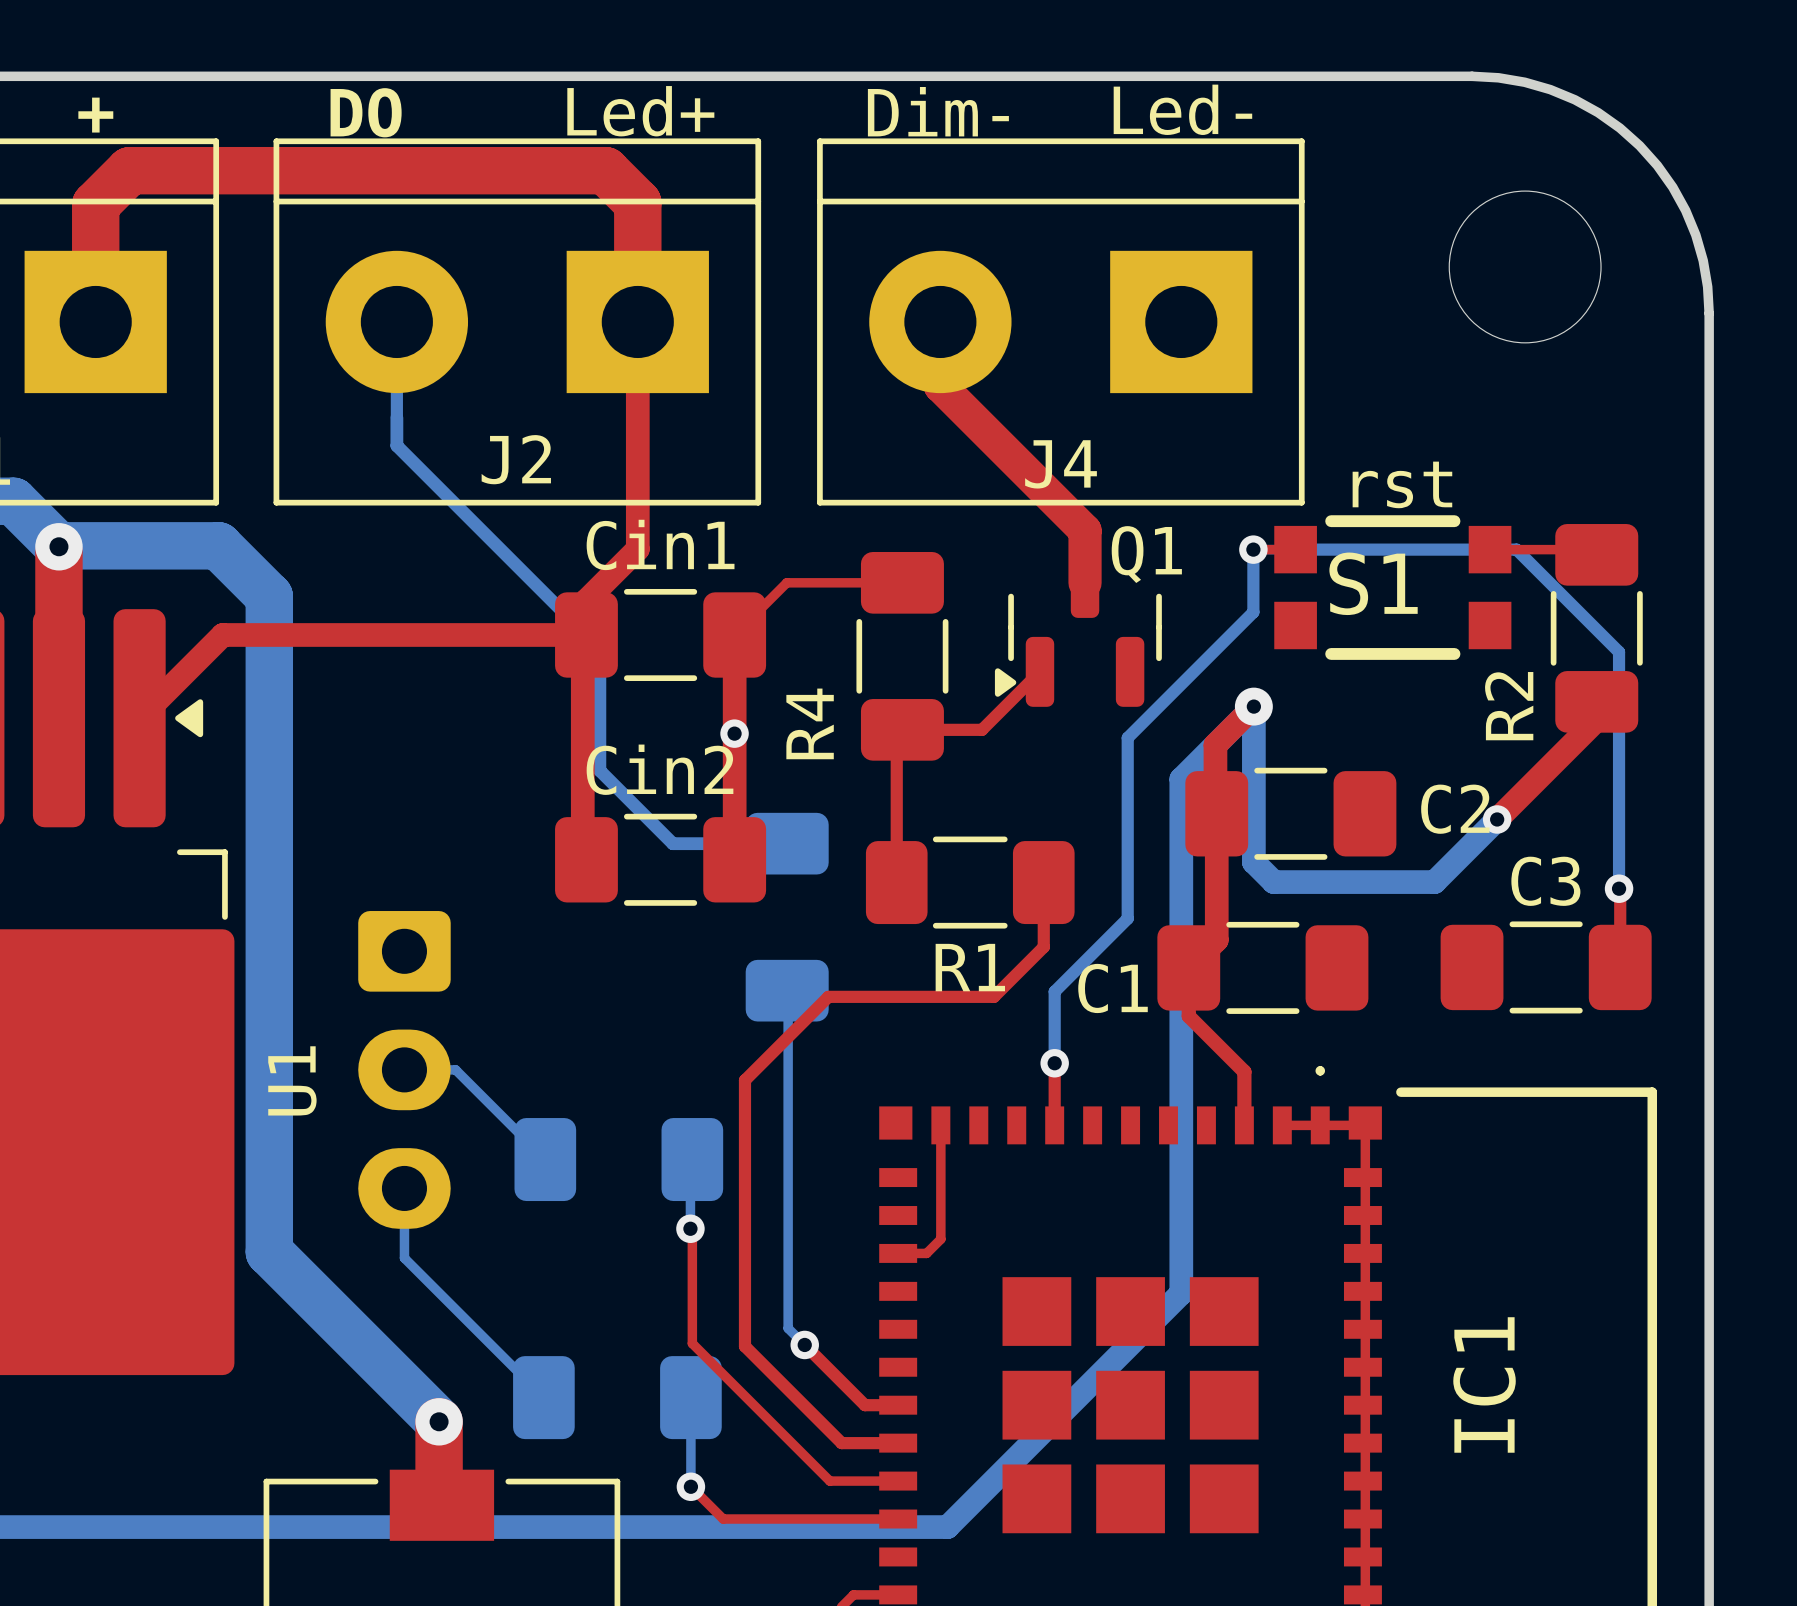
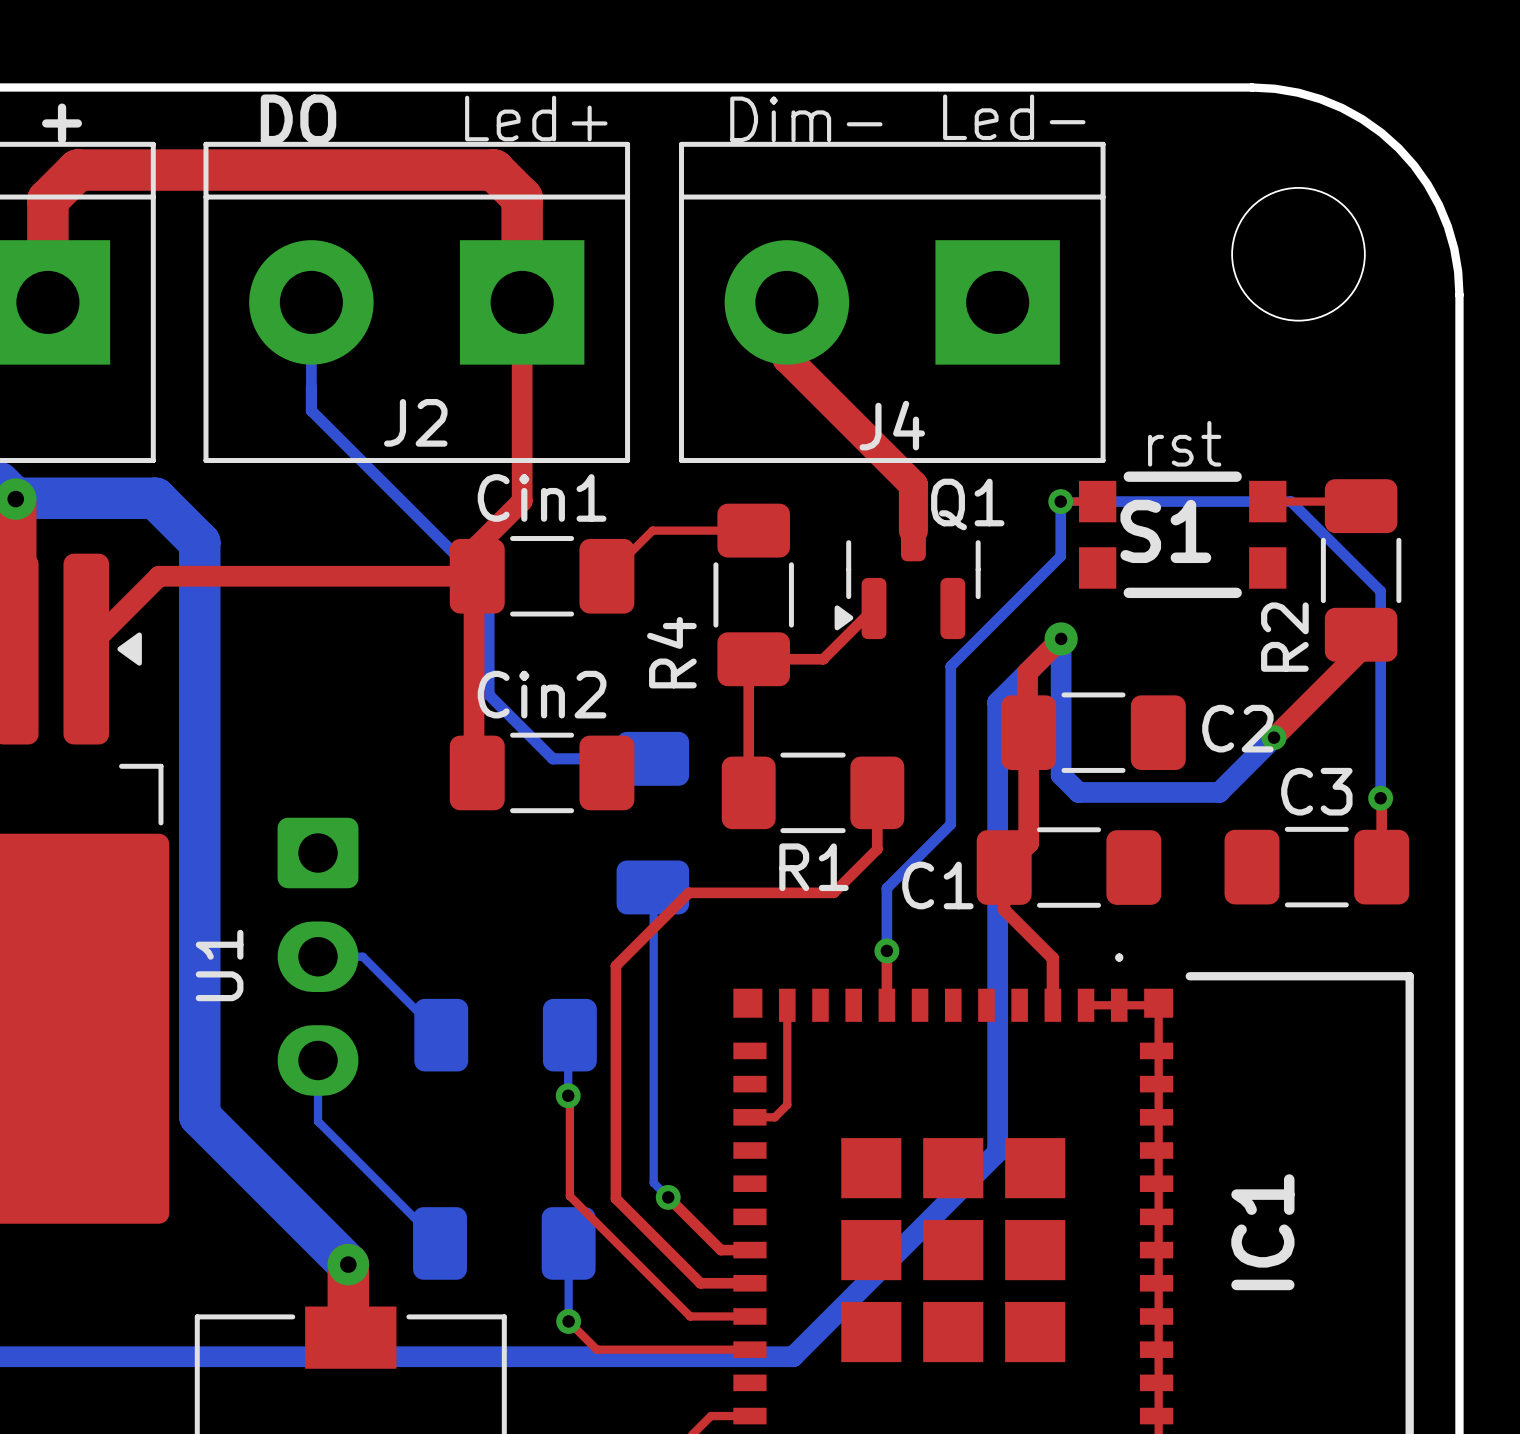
top track: (734, 634) (734, 859) -> none
via: (734, 733) -> none

